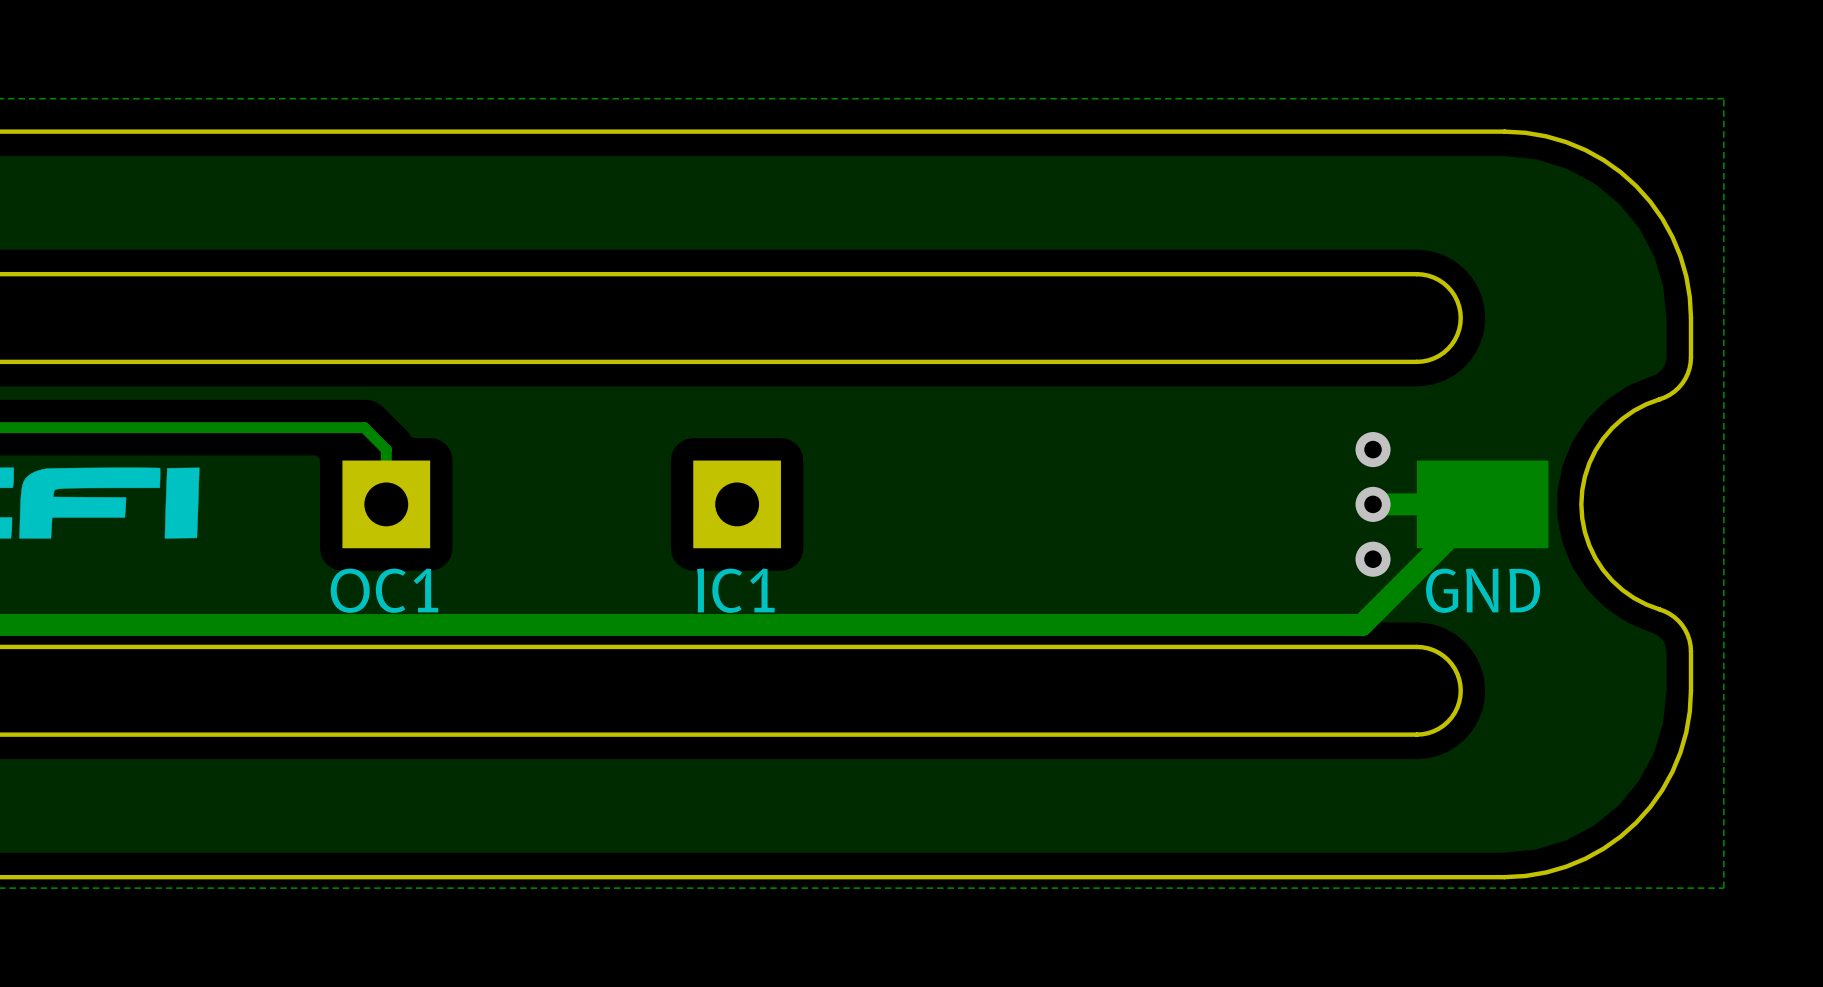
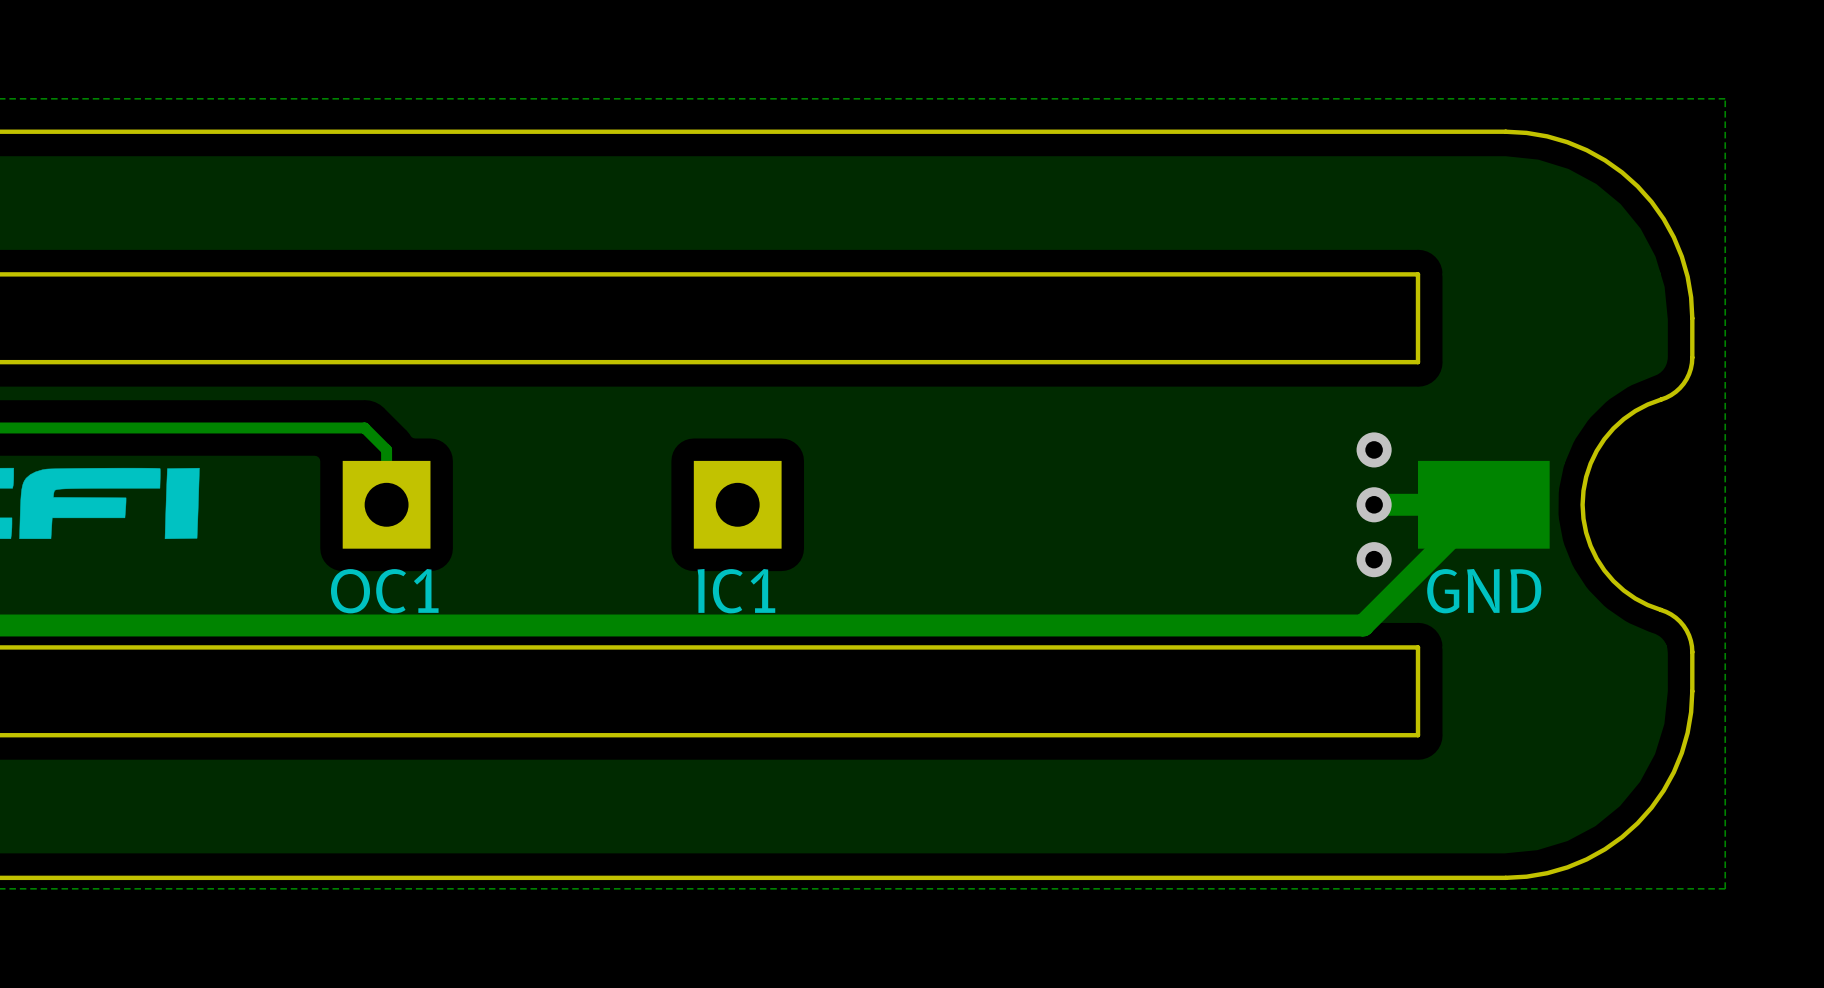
board edge: (1416, 274) (1433, 277) (1447, 287) (1457, 301) (1460, 318) (1457, 334) (1447, 349) (1433, 358) (1416, 361) -> (1418, 274) (1418, 362)
board edge: (1416, 646) (1433, 650) (1447, 659) (1457, 673) (1460, 690) (1457, 707) (1447, 721) (1433, 731) (1416, 734) -> (1418, 647) (1418, 735)

